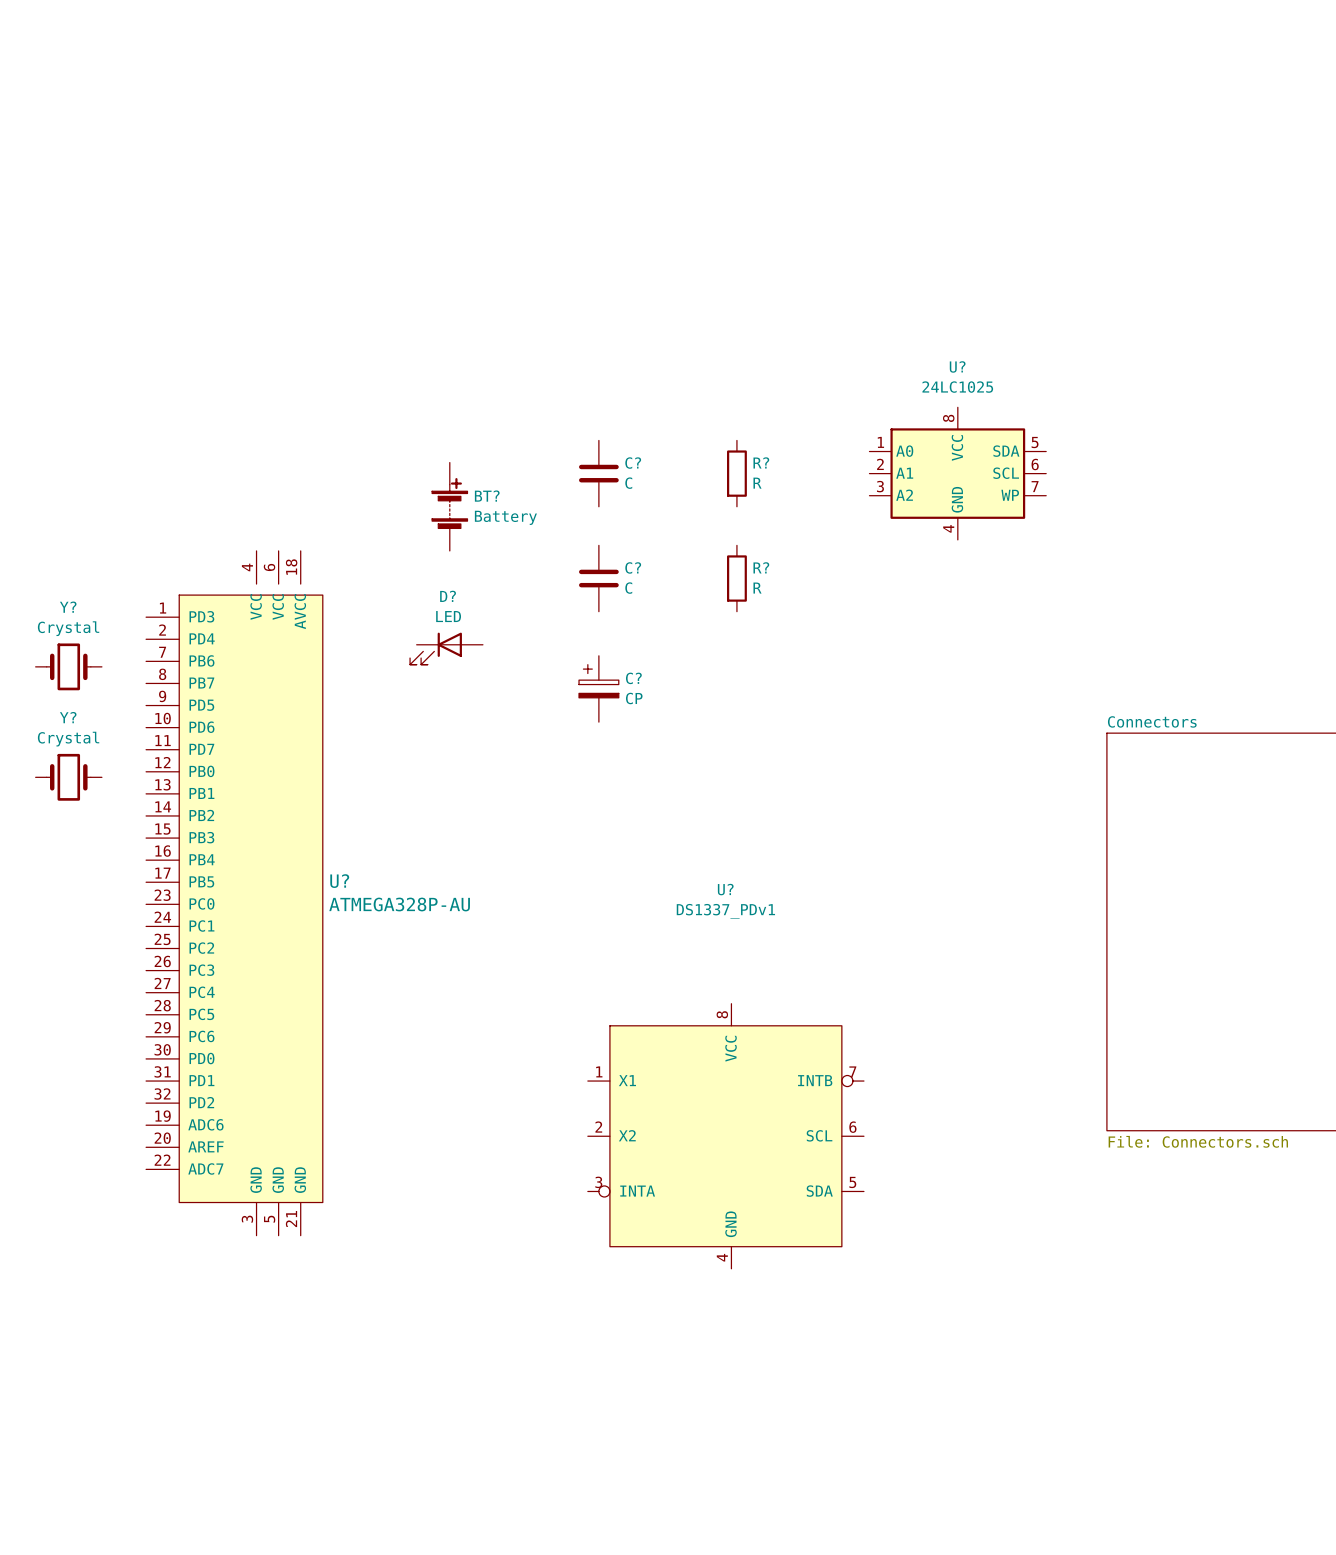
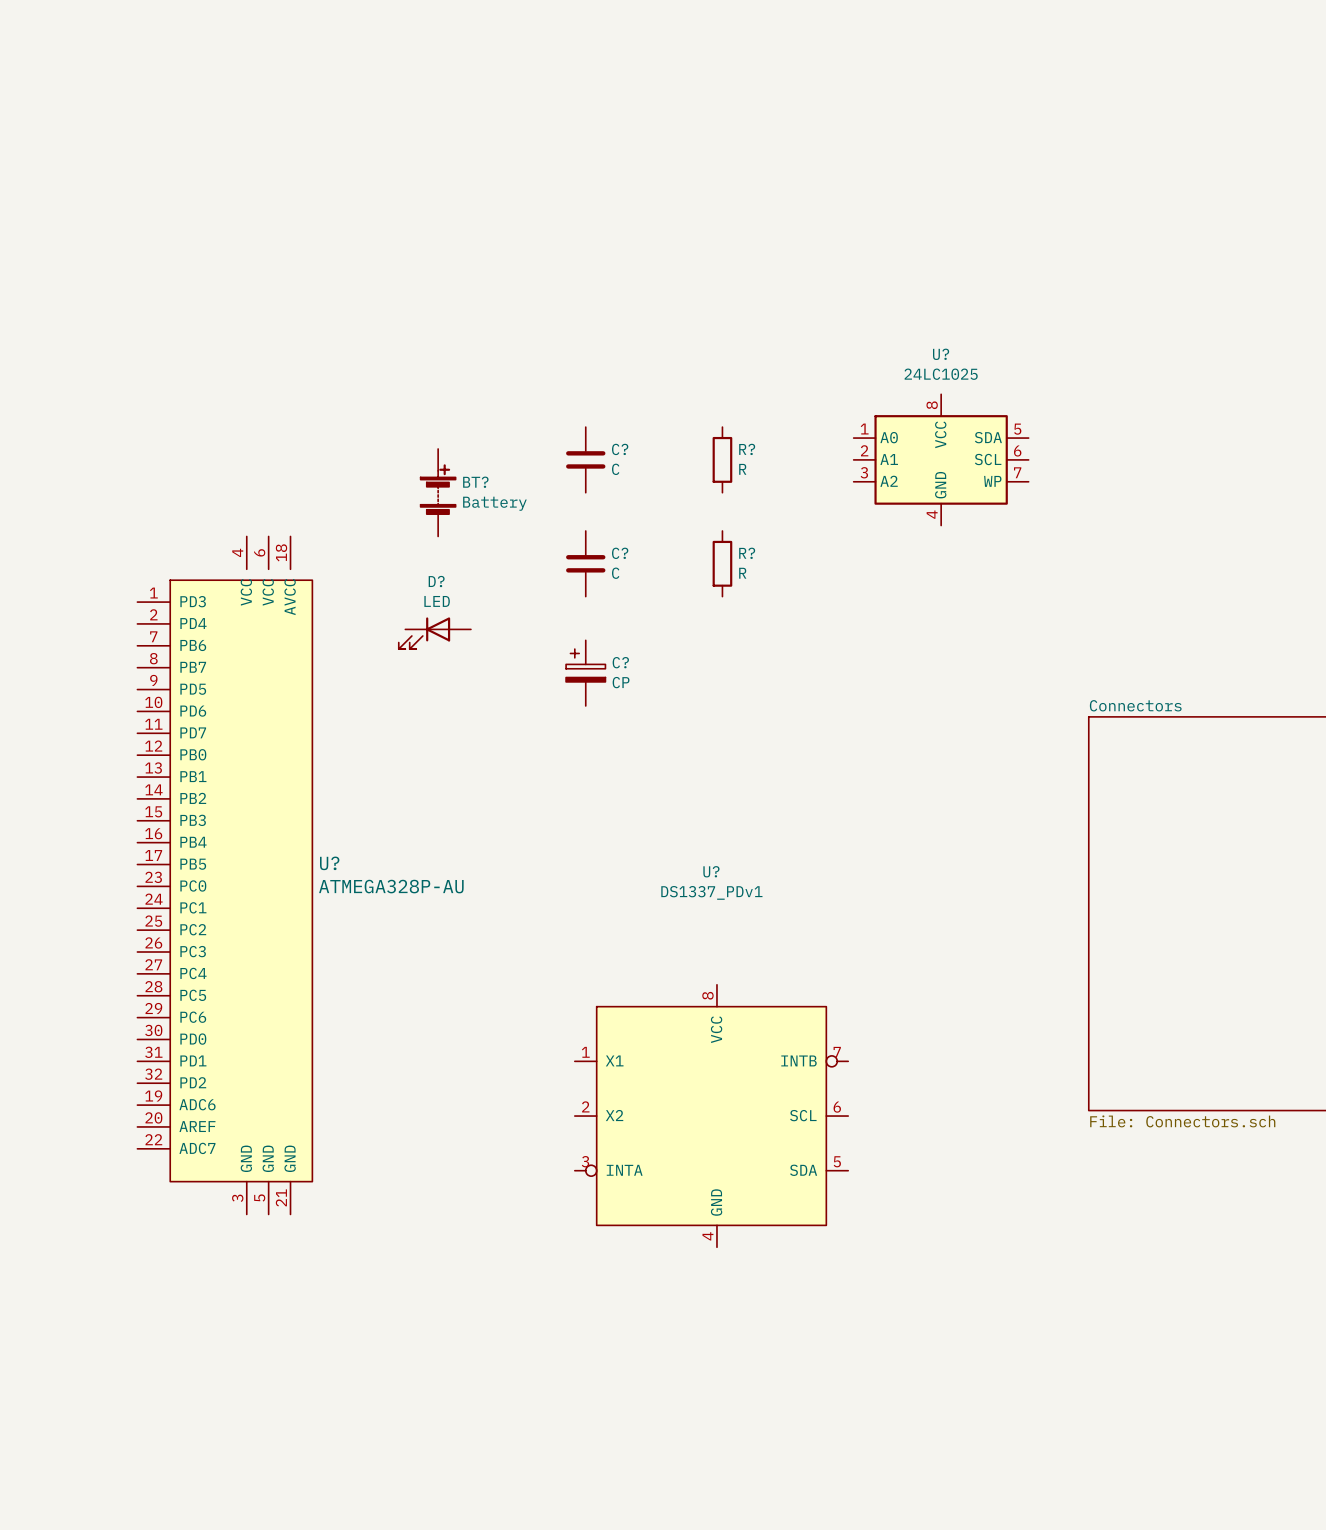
Y?: Crystal (68, 666) -> none
Y?: Crystal (68, 777) -> none

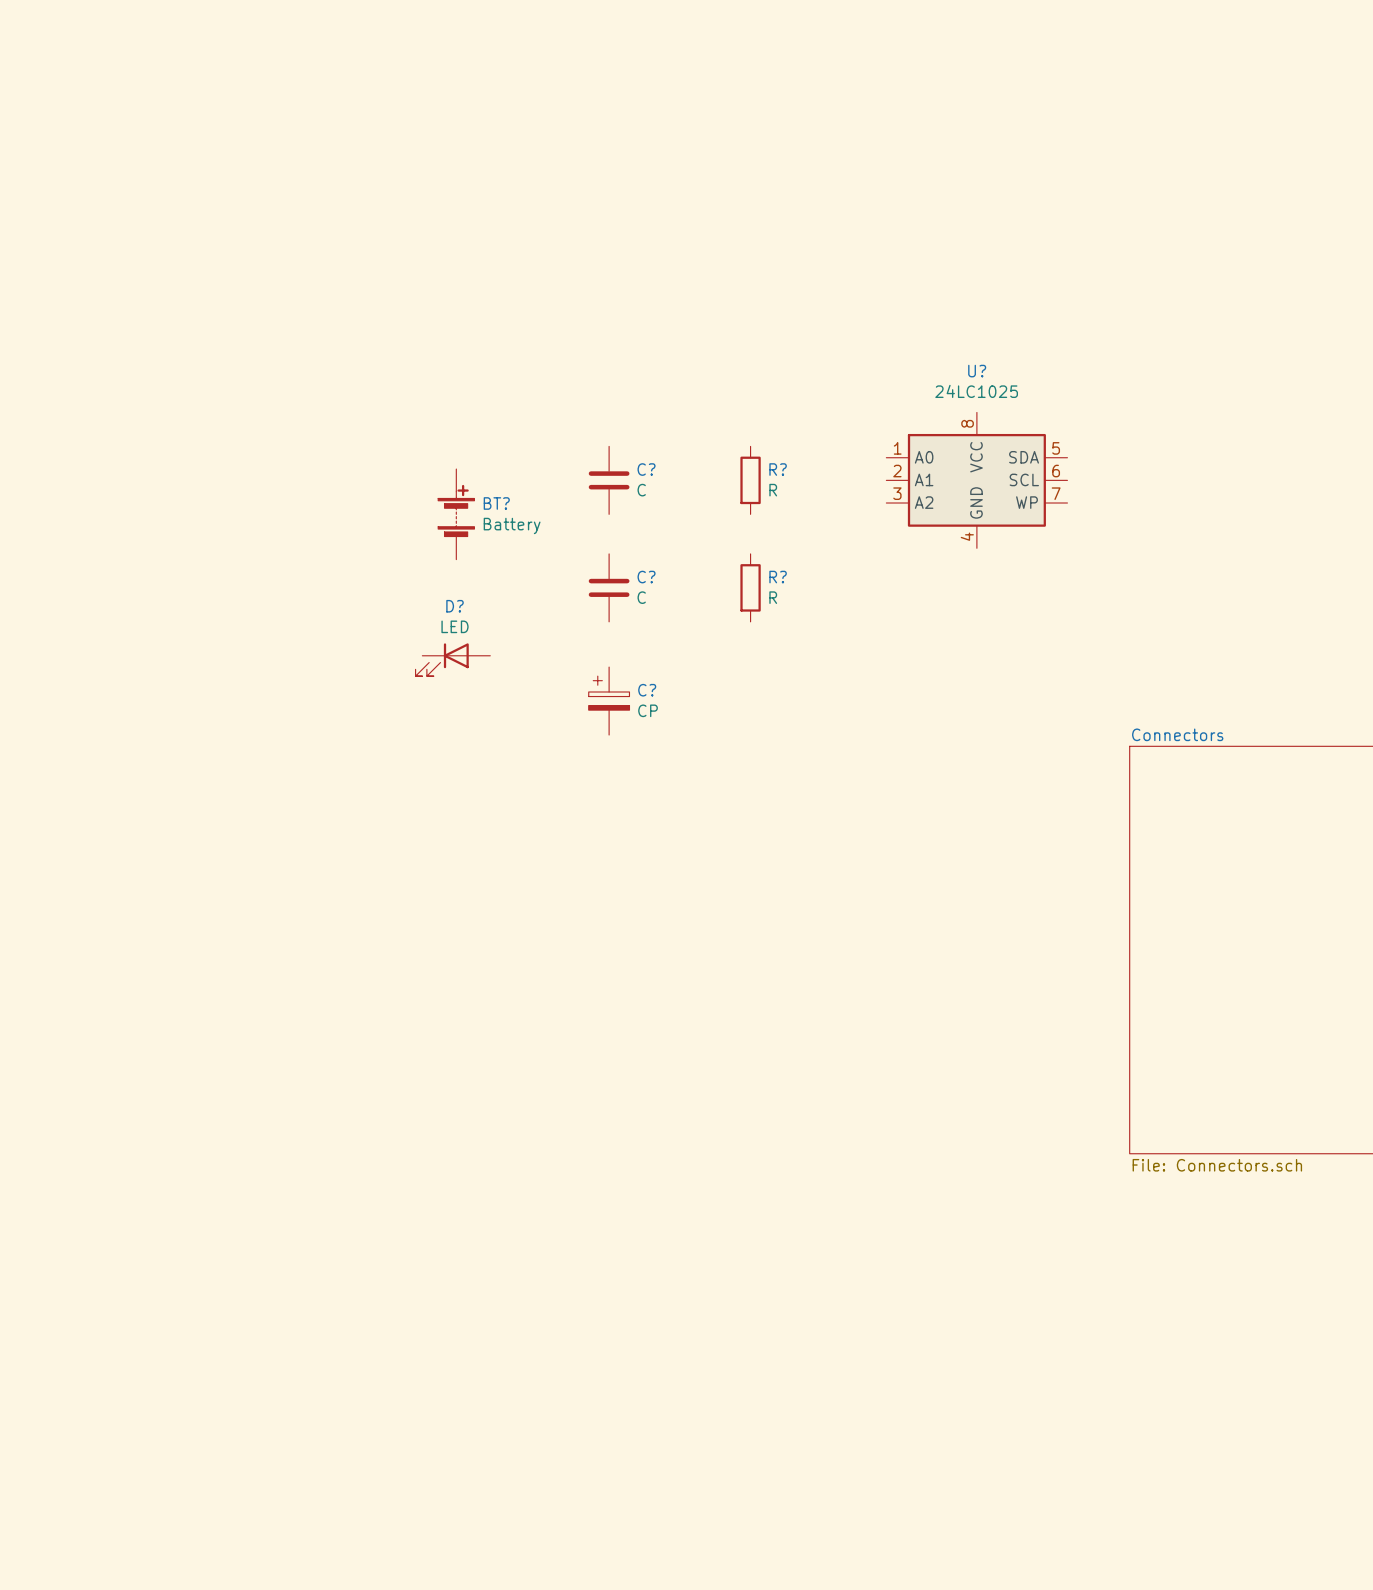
U?: ATMEGA328P-AU (224, 875) -> none
U?: DS1337_PDv1 (711, 1077) -> none

